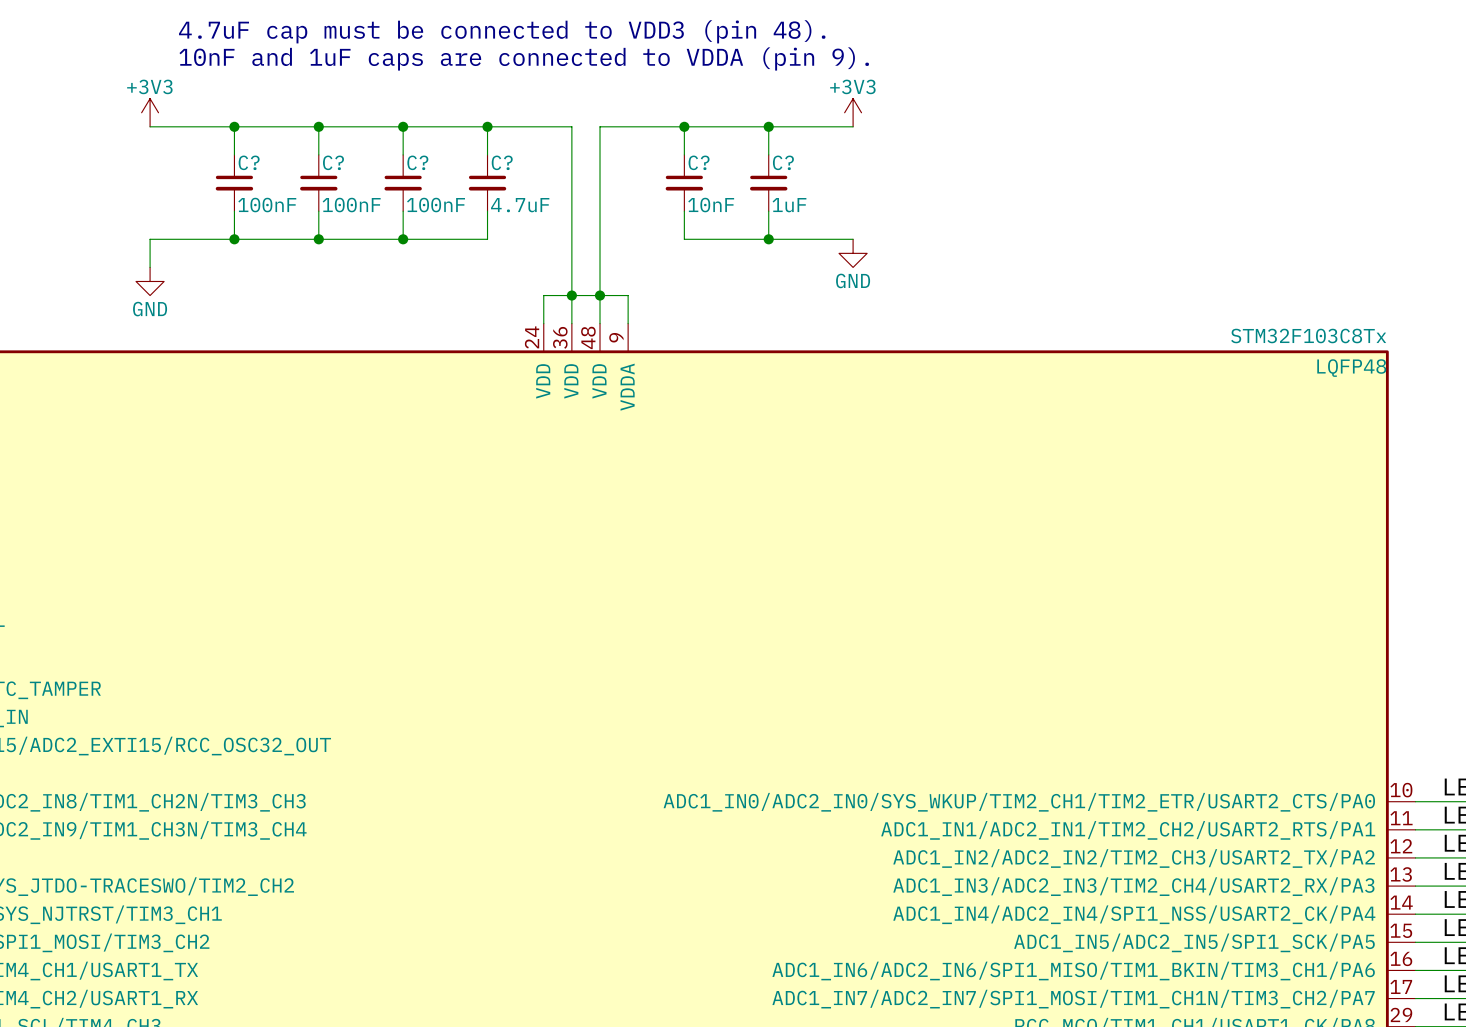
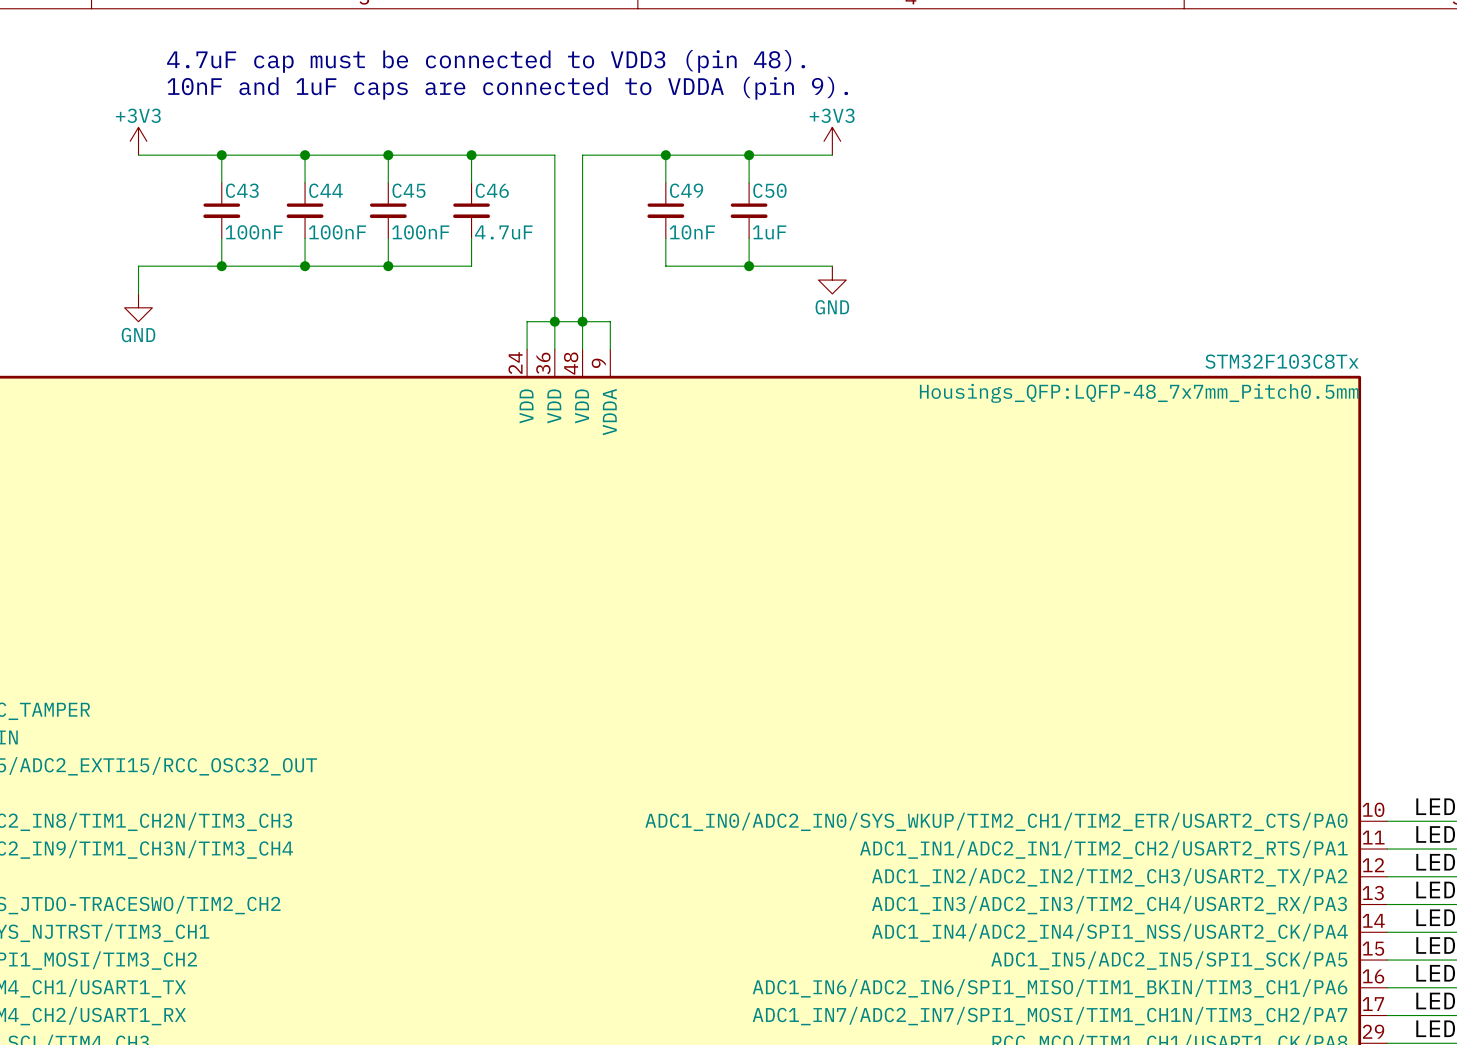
C? name: C? (249, 162) -> C43 (242, 190)
C? name: C? (333, 162) -> C44 (326, 190)
C? name: C? (417, 162) -> C45 (408, 190)
C? name: C? (502, 162) -> C46 (492, 190)
C? name: C? (699, 162) -> C49 (686, 190)
C? name: C? (783, 162) -> C50 (769, 190)
part text: LQFP48 (1351, 368) -> Housings_QFP:LQFP-48_7x7mm_Pitch0.5mm (1139, 393)

